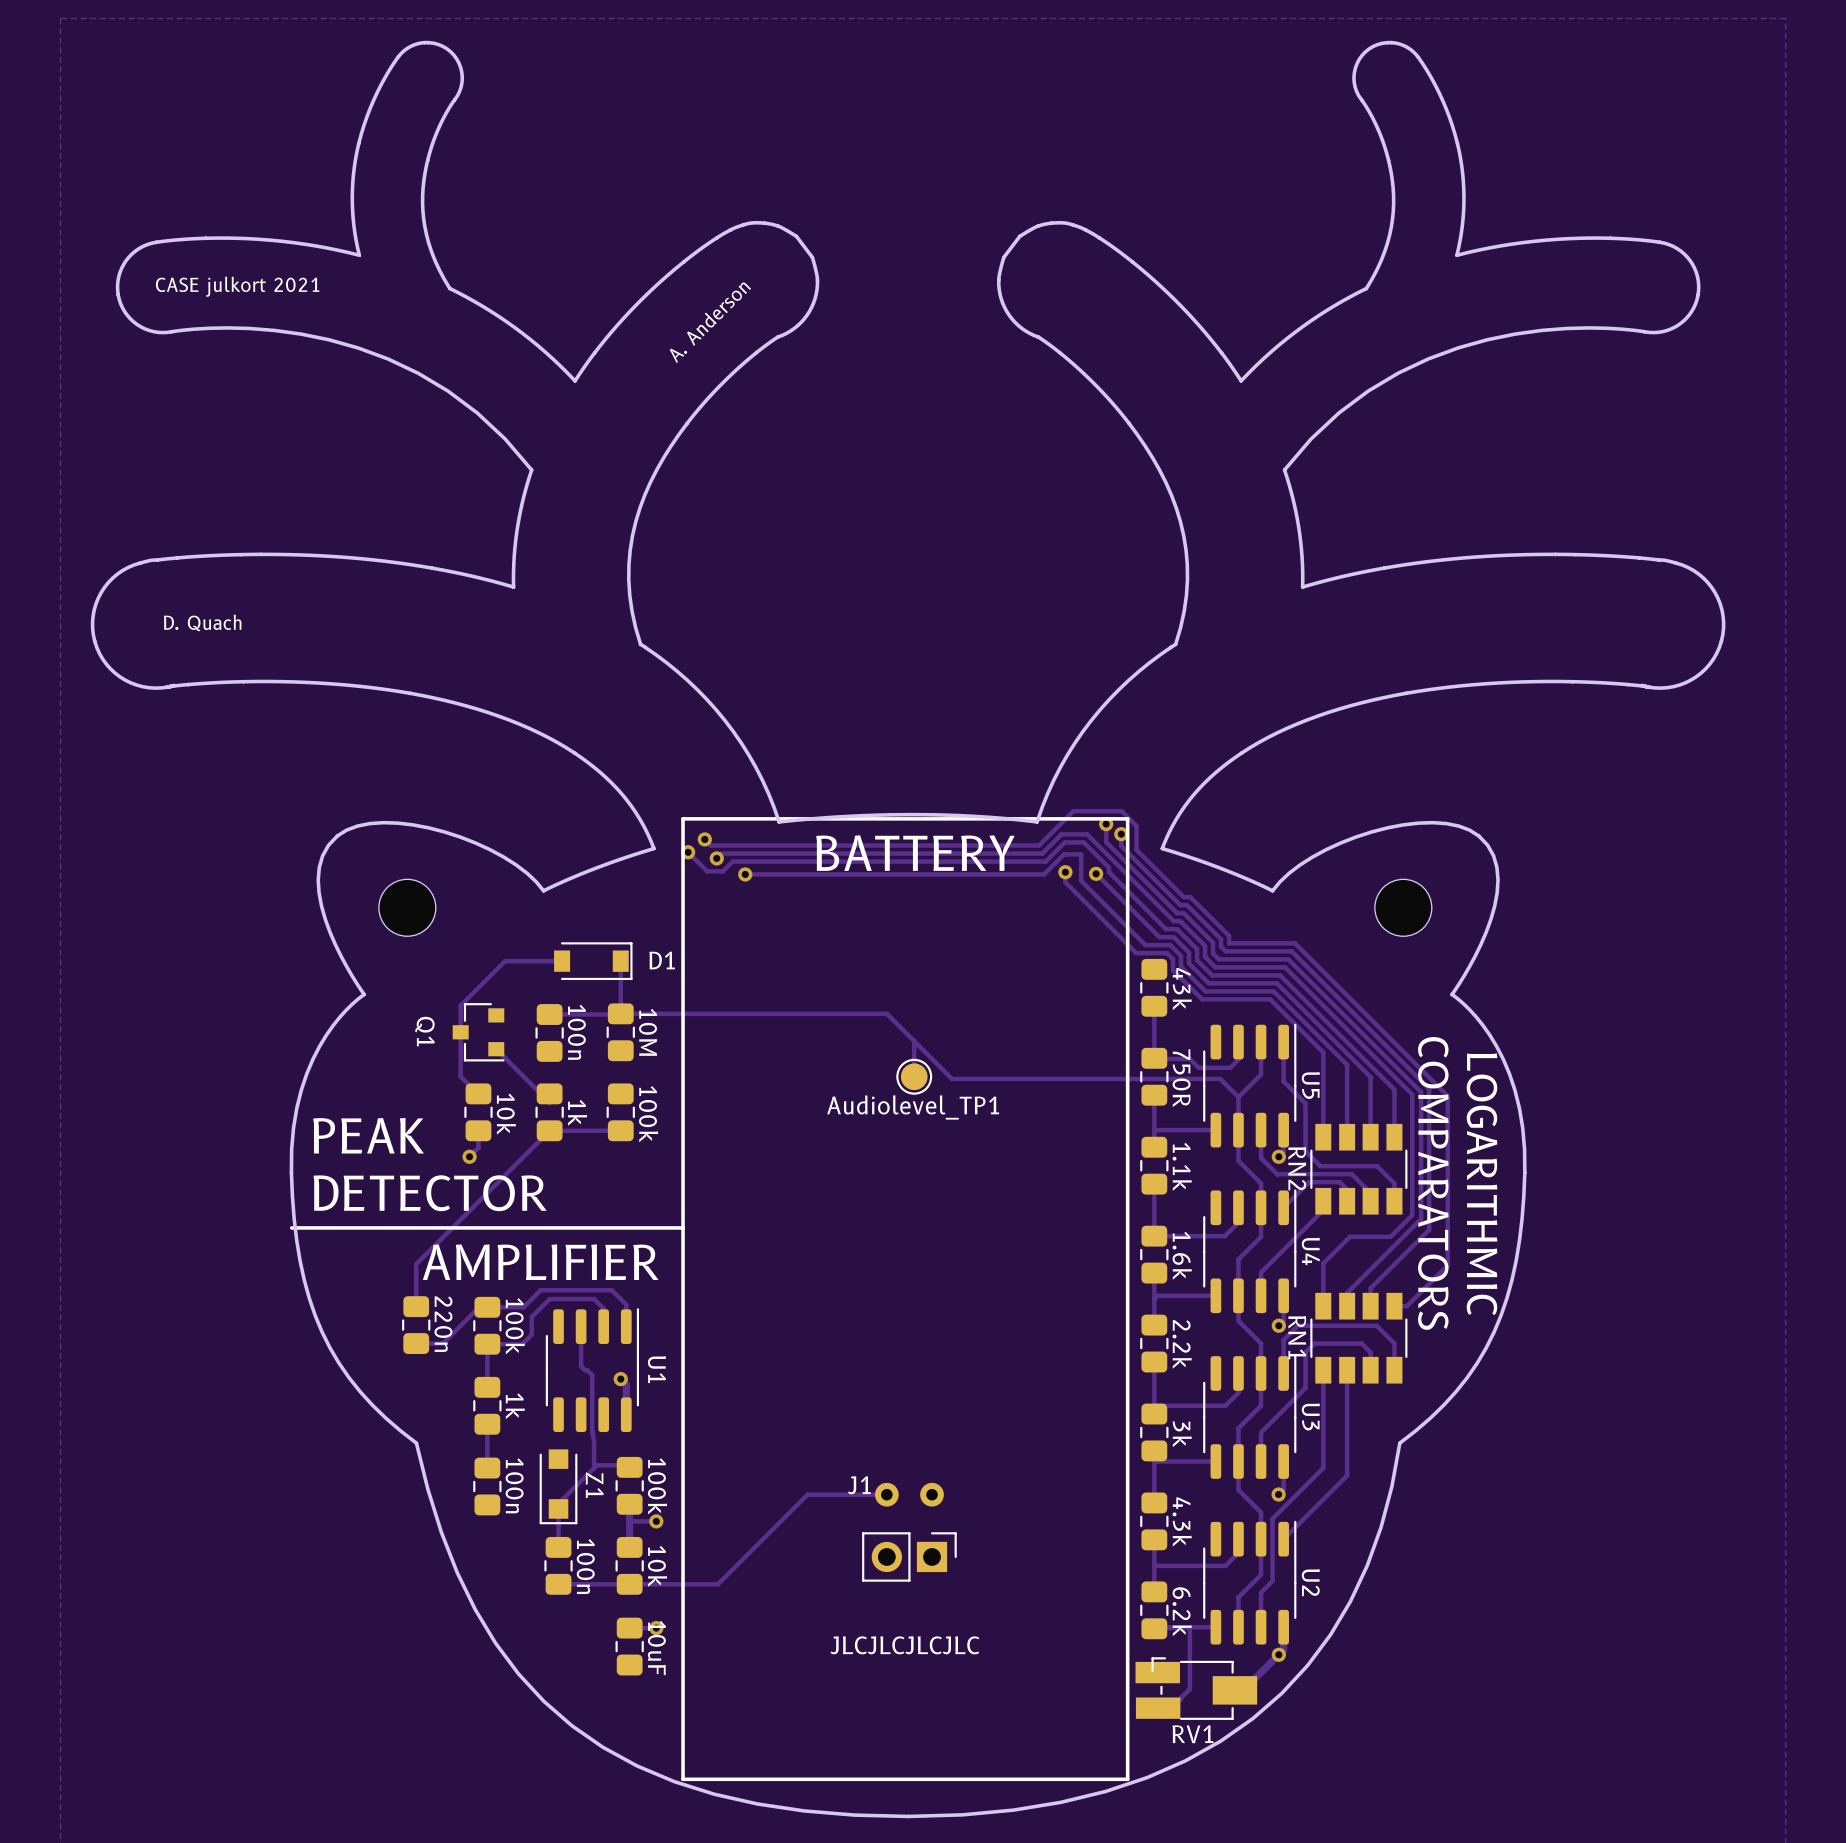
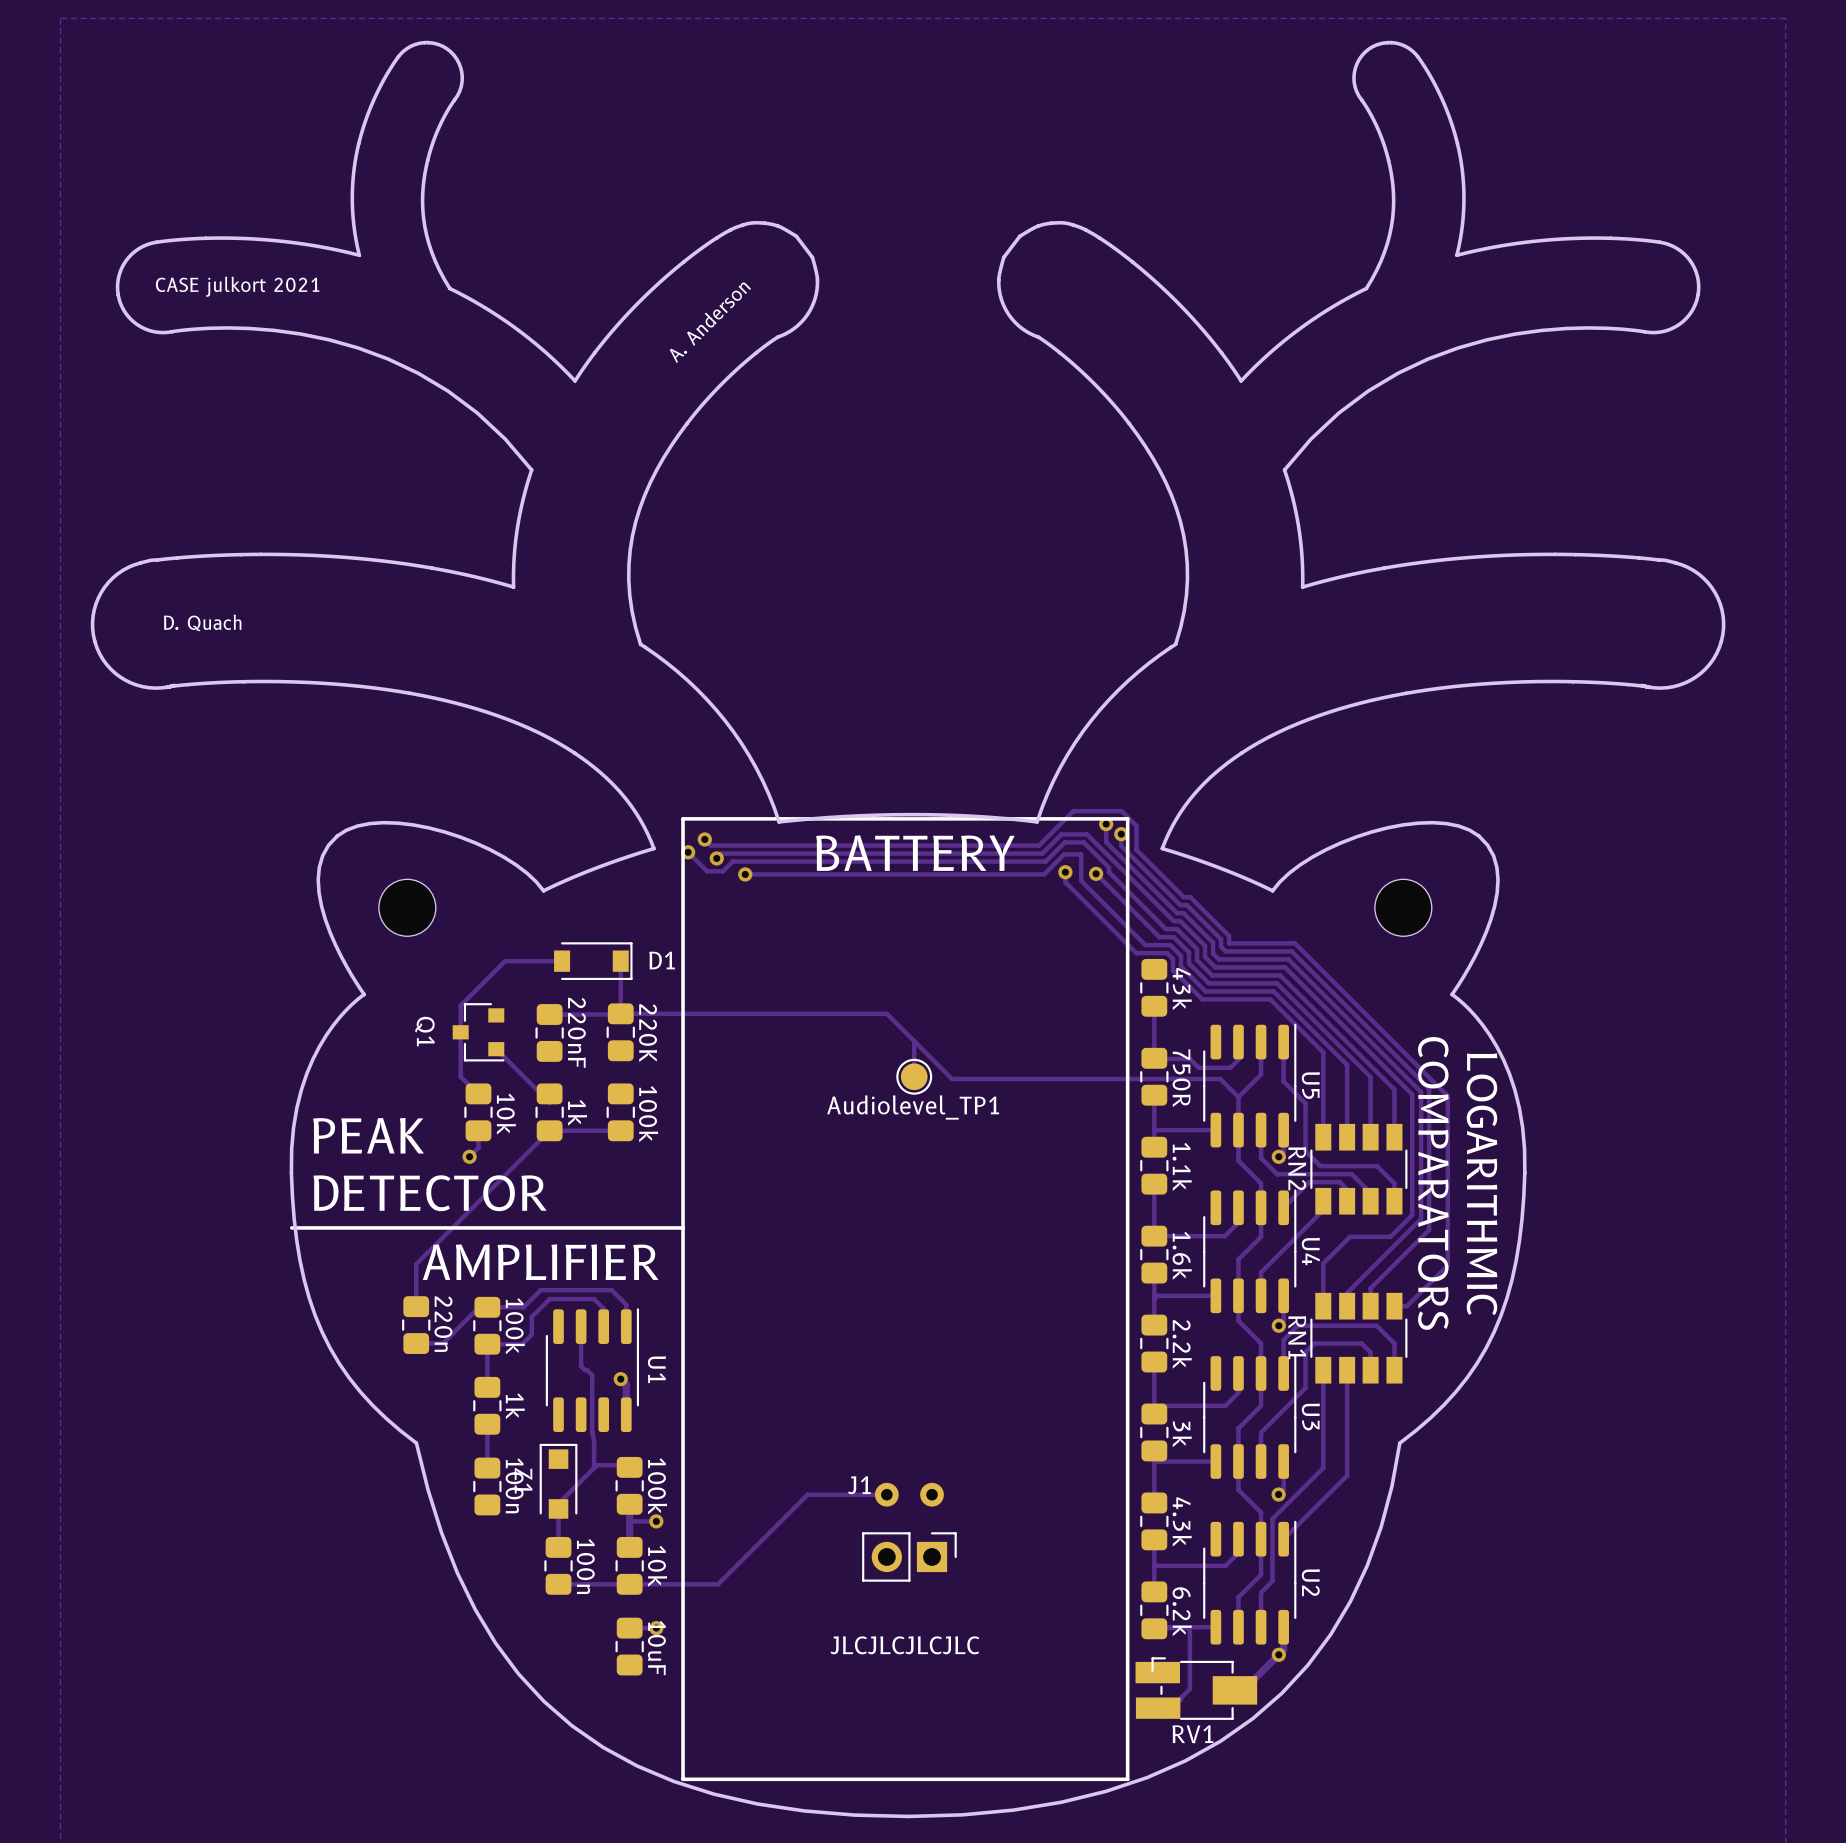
part value: 100n (576, 1032) -> 220nF (576, 1032)
part value: 10M (648, 1032) -> 220K (648, 1033)
Z1 rotation: 0° (558, 1486) -> 180° (558, 1481)

